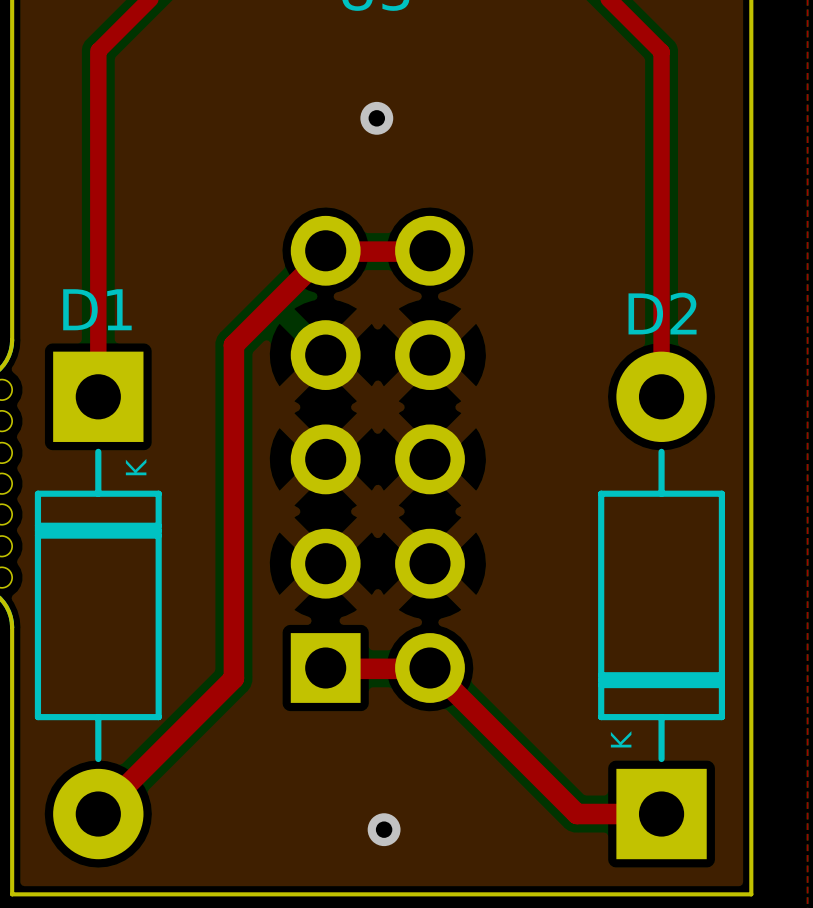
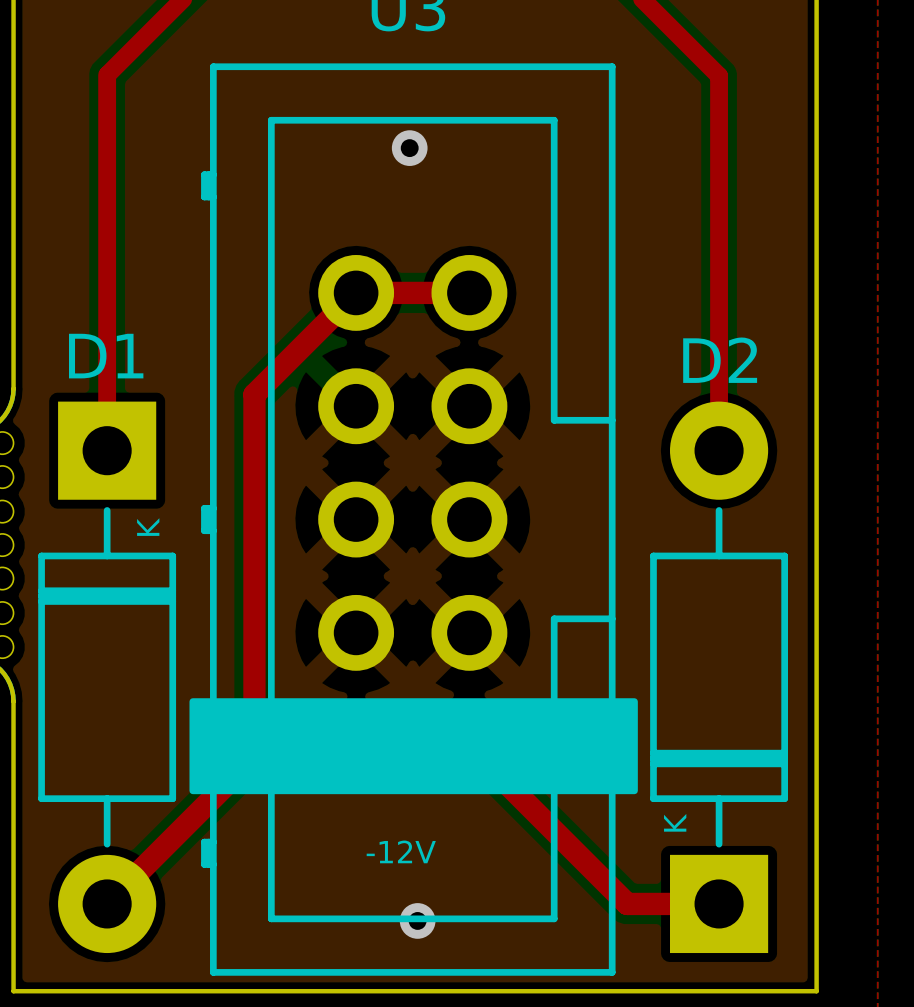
part side: bottom (377, 459) -> top (413, 519)

